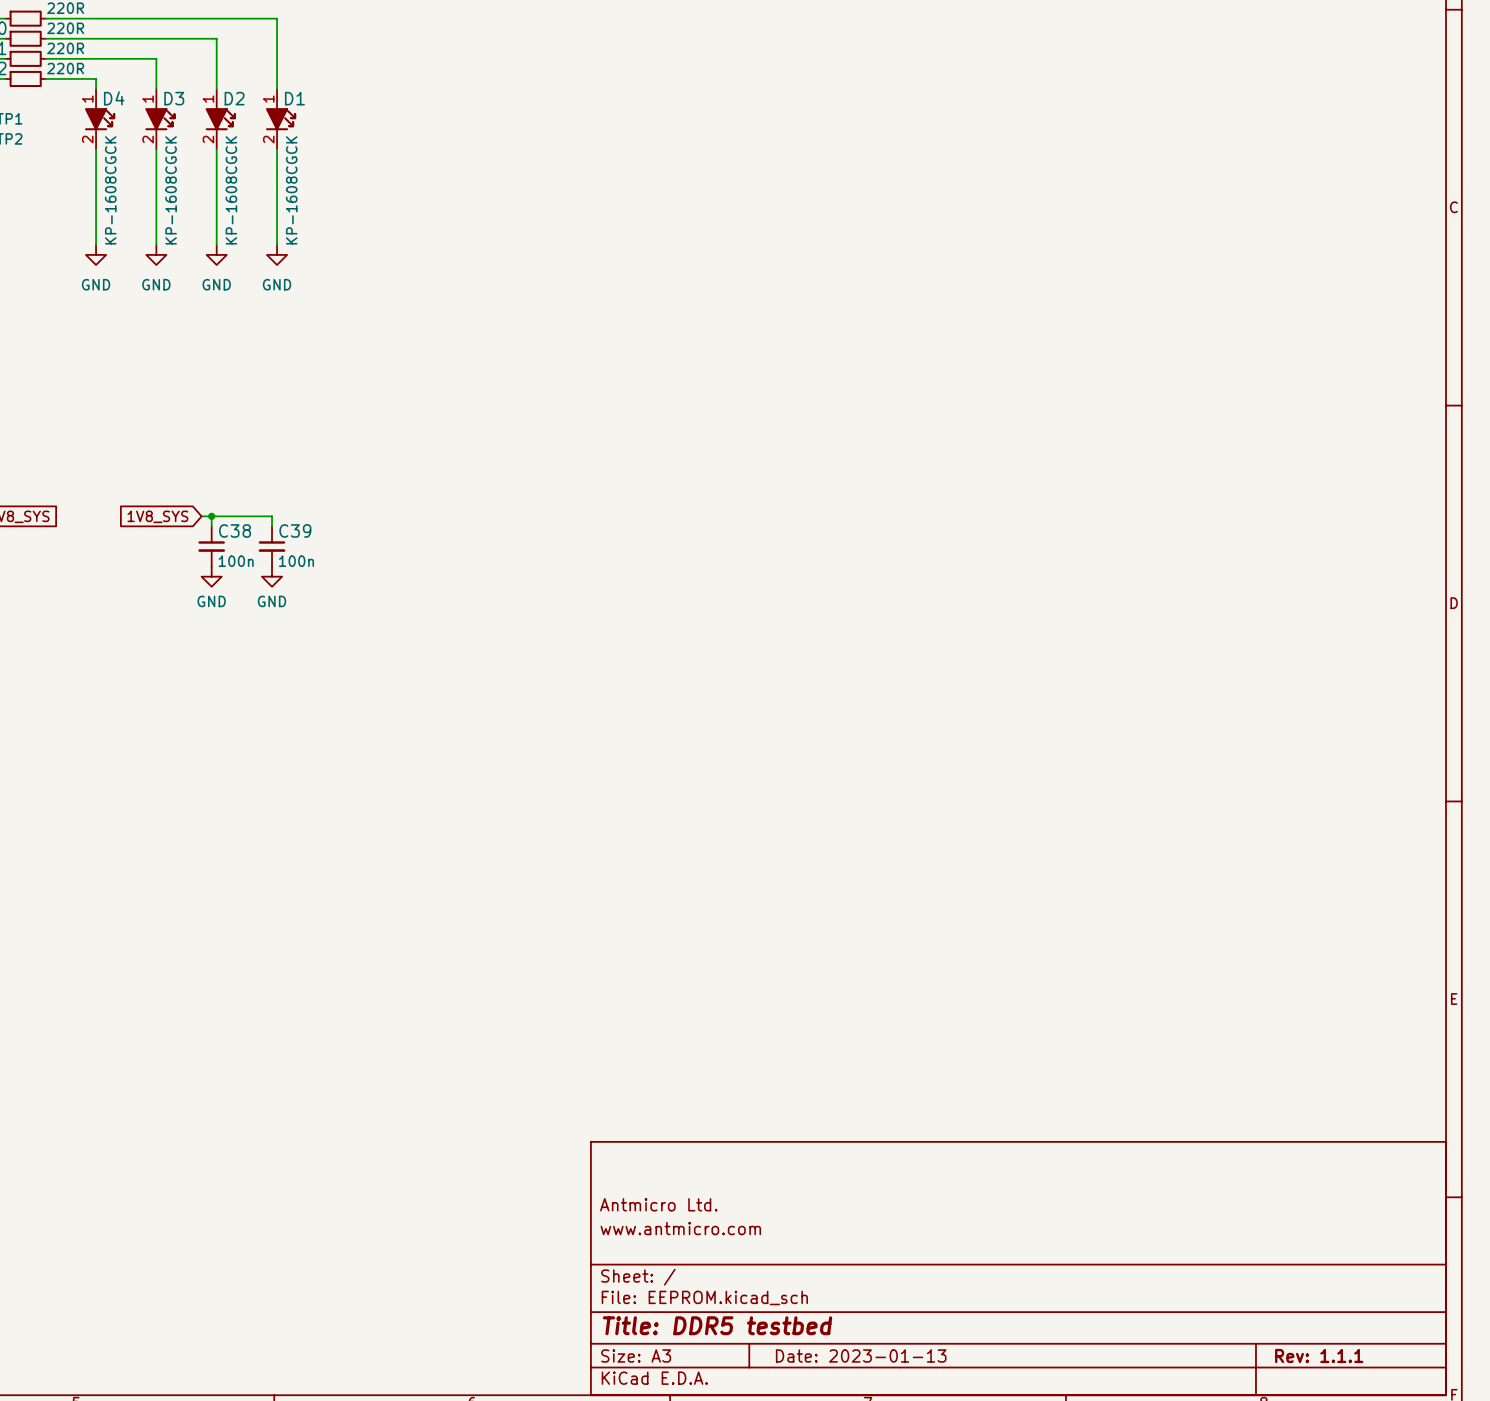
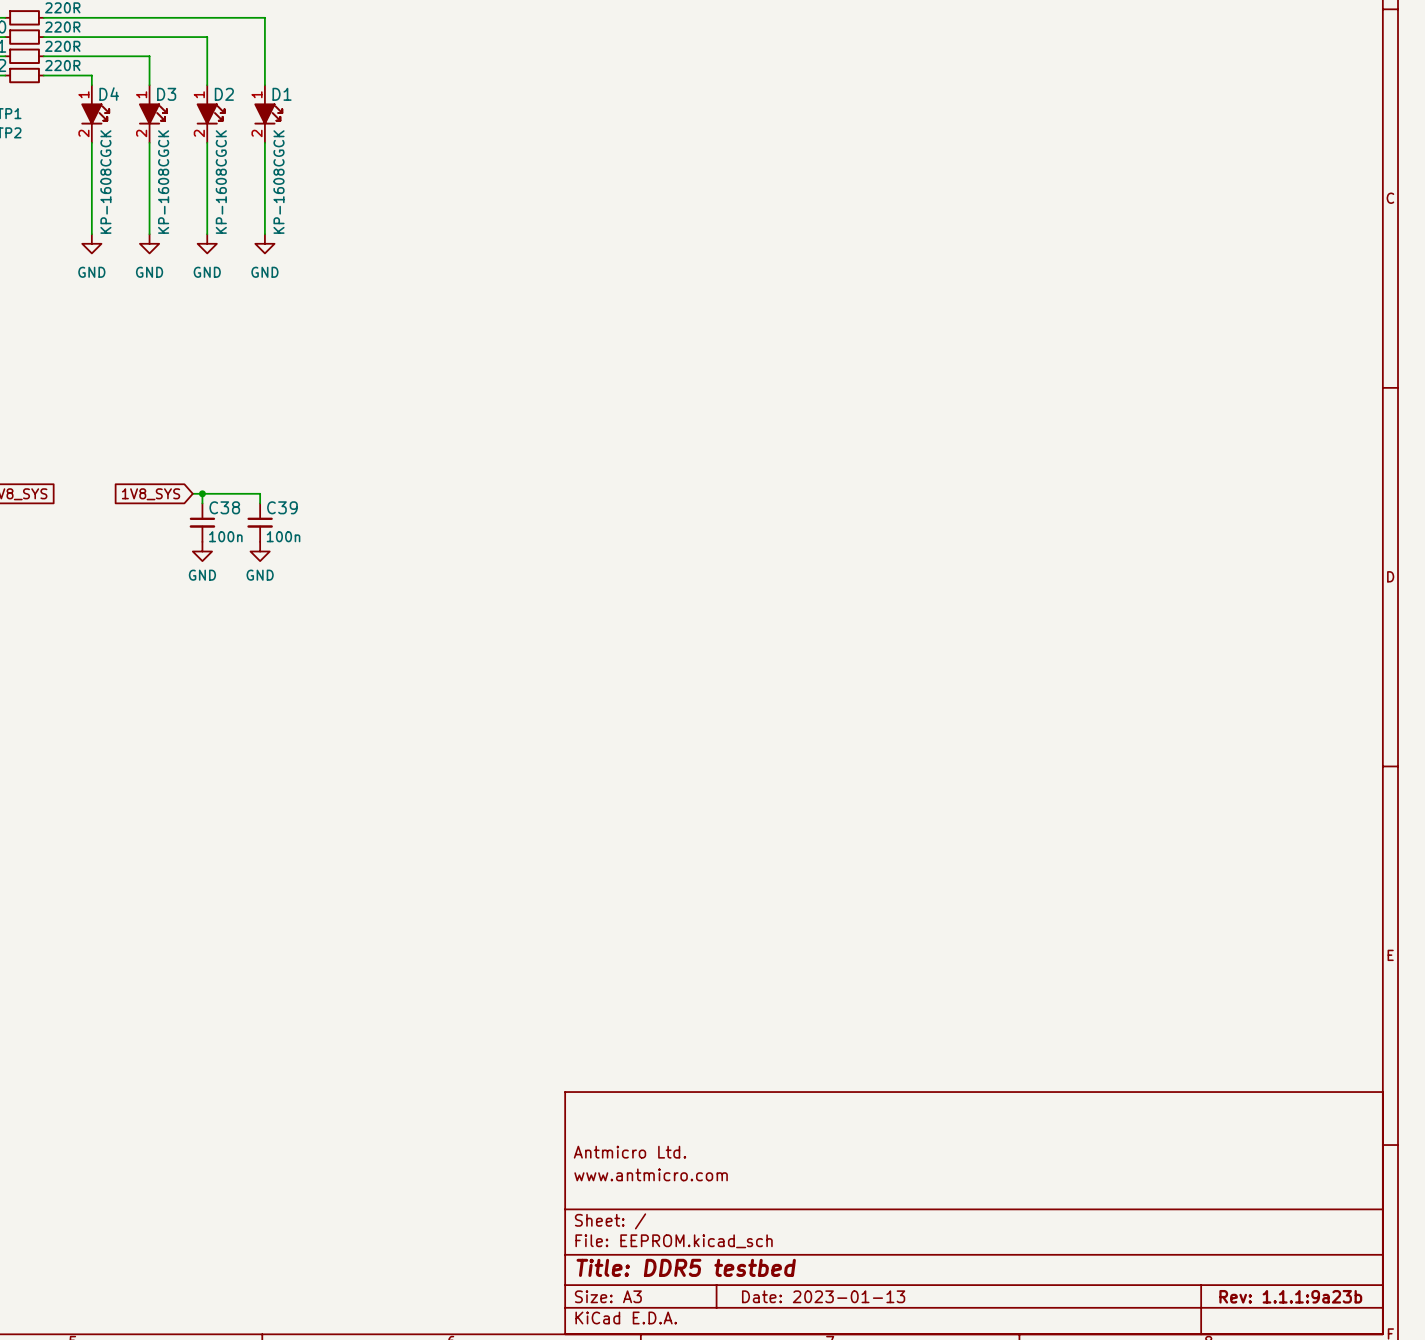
title block: Rev: 1.1.1 (1319, 1355) -> Rev: 1.1.1:9a23b (1290, 1296)

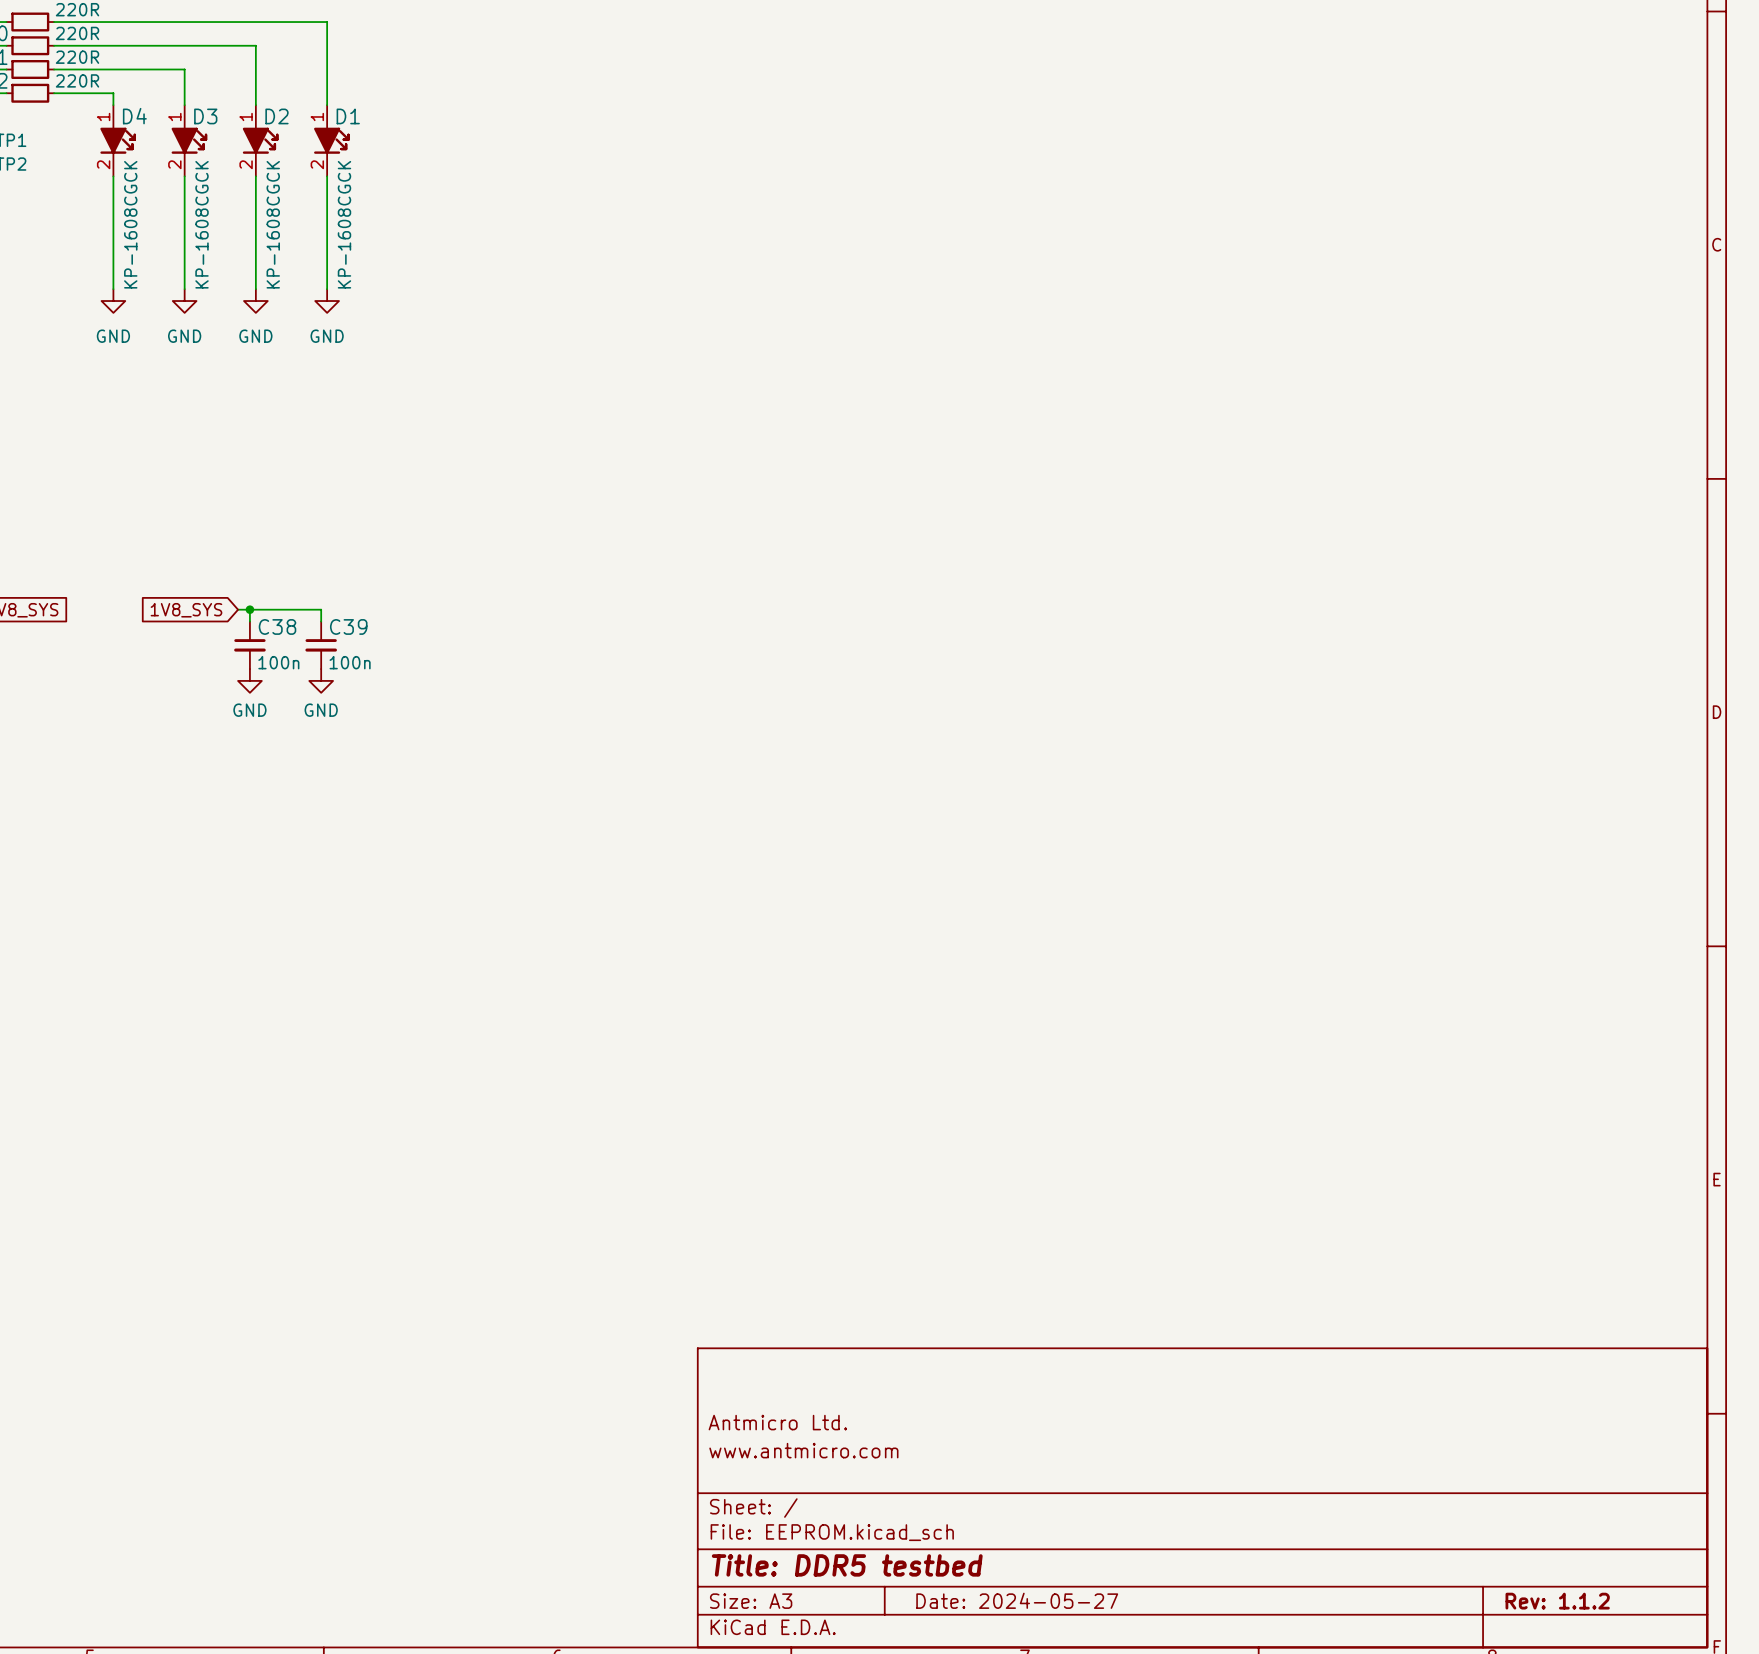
title block: Date: 2023-01-13 (823, 1296) -> Date: 2024-05-27 (1017, 1600)
title block: Rev: 1.1.1:9a23b (1290, 1296) -> Rev: 1.1.2 (1557, 1601)

